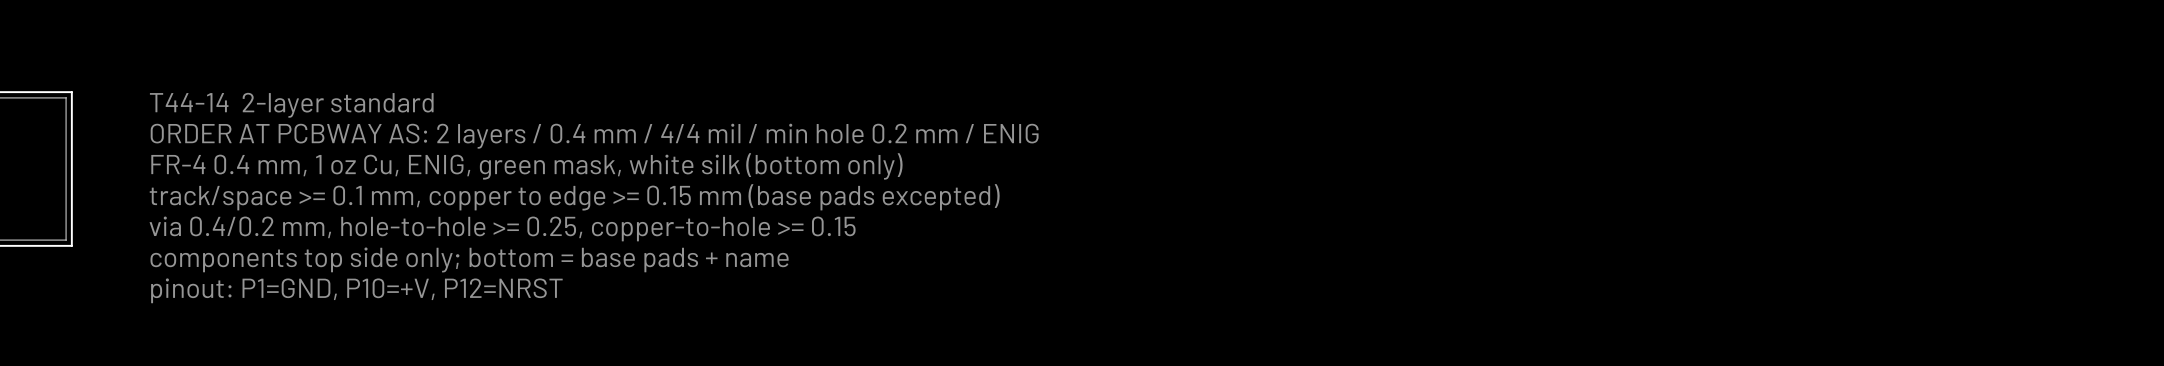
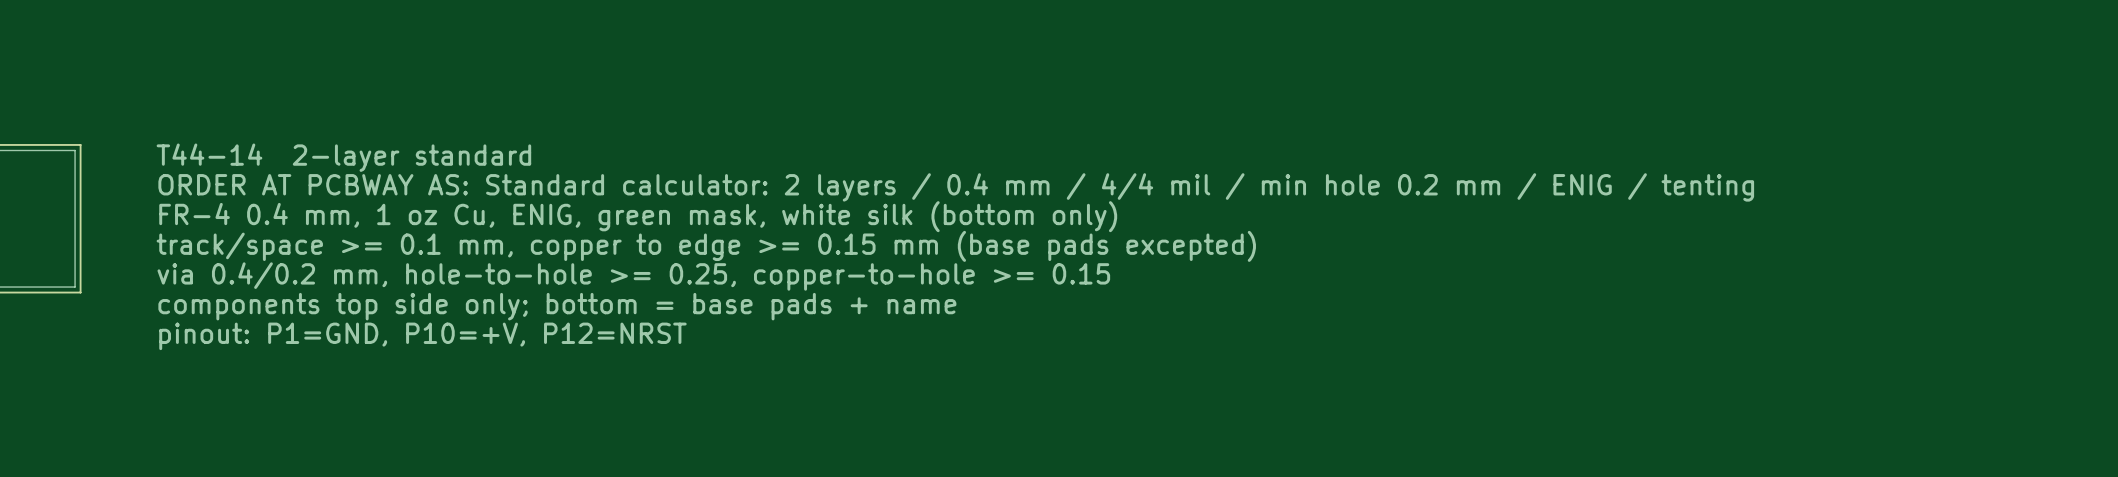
text: ORDER AT PCBWAY AS: 2 layers / 0.4 mm / 4/4 mil / min hole 0.2 mm / ENIG (594, 136) -> ORDER AT PCBWAY AS: Standard calculator: 2 layers / 0.4 mm / 4/4 mil / min hole 0.2 mm / ENIG / tenting (956, 187)

